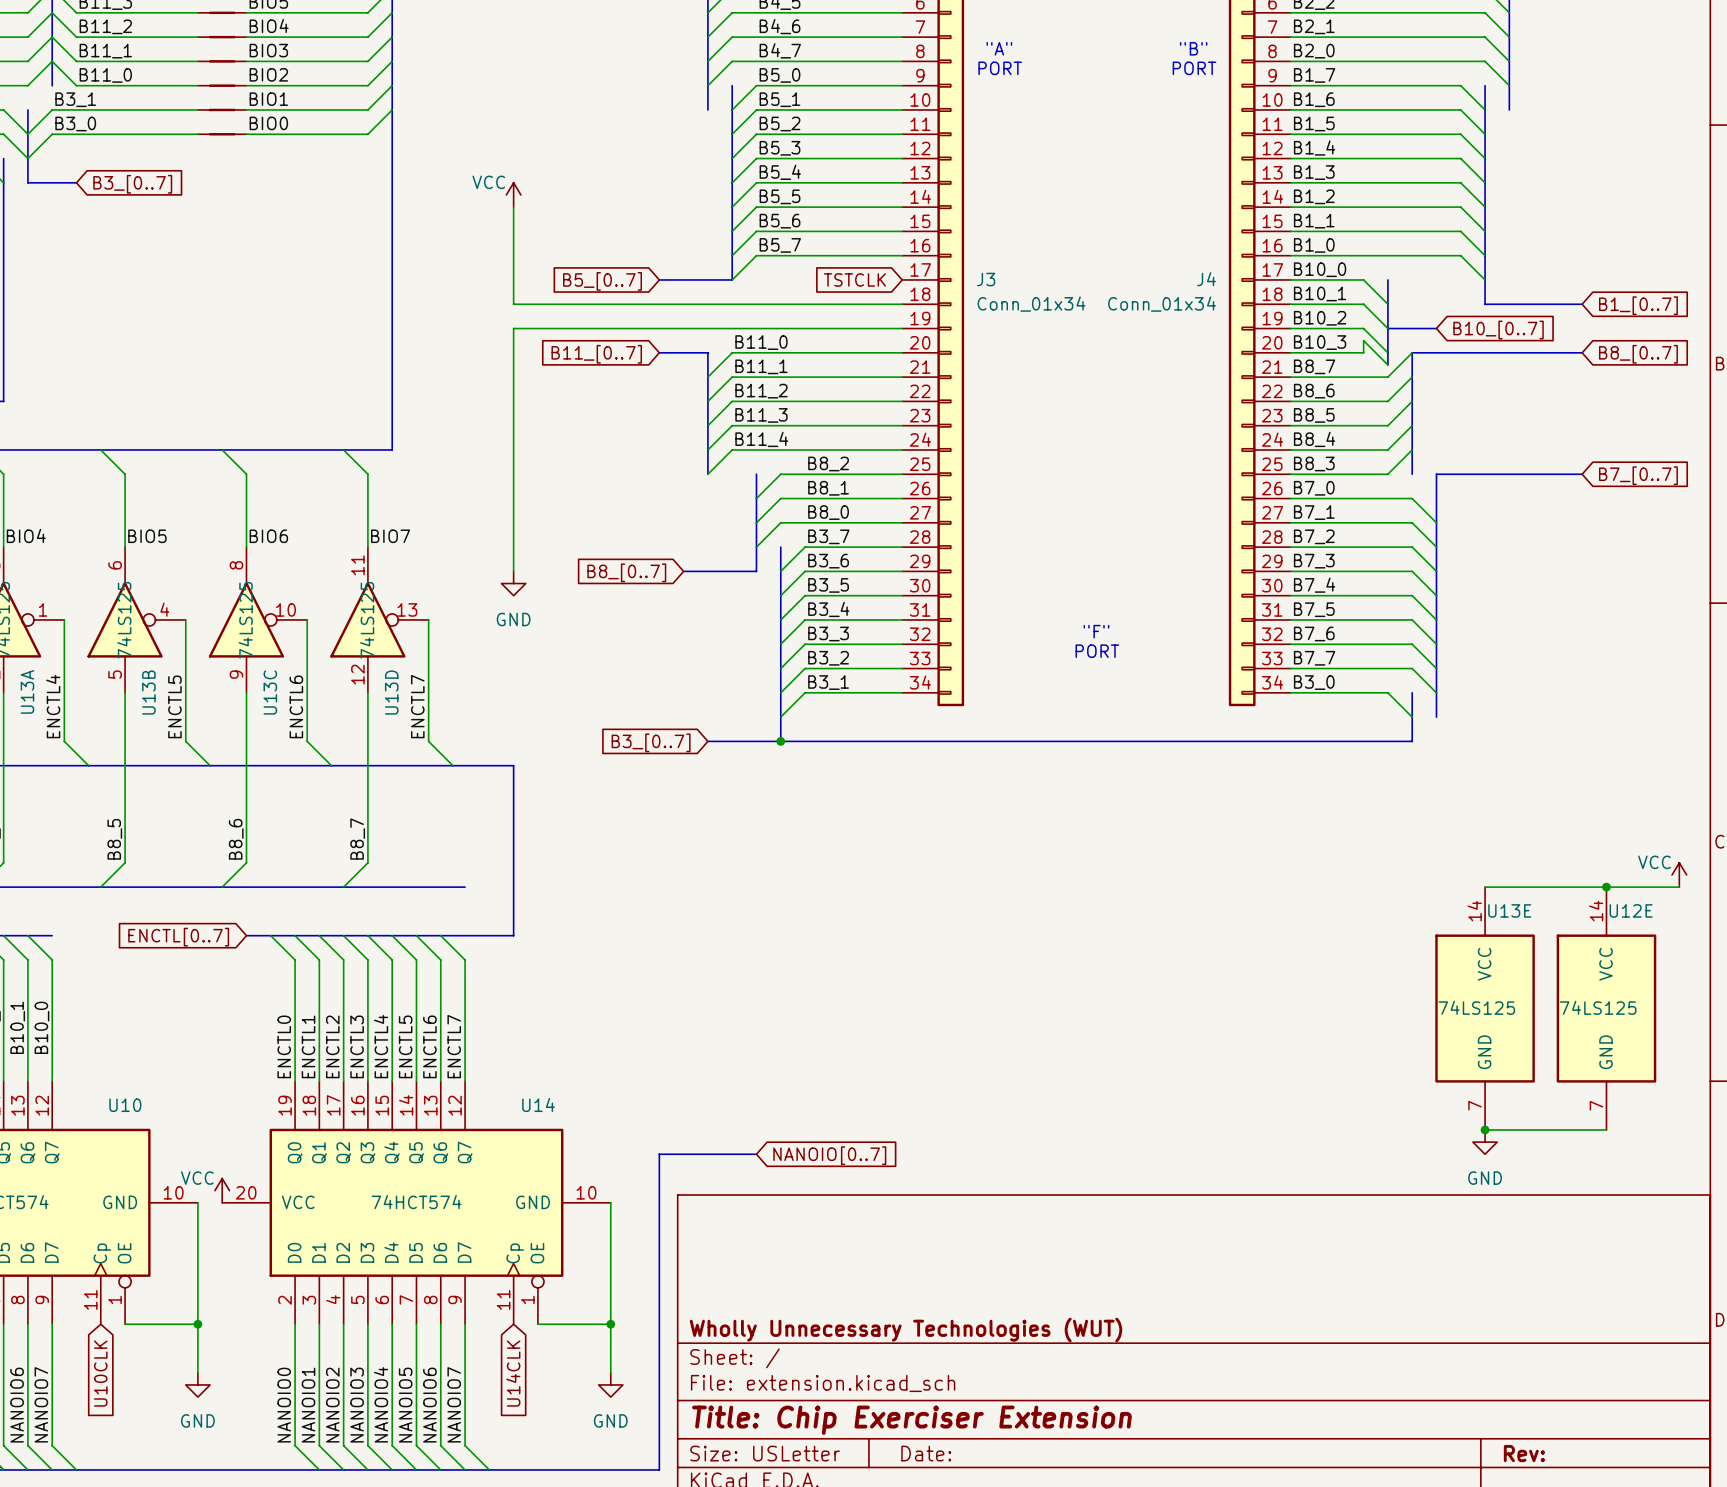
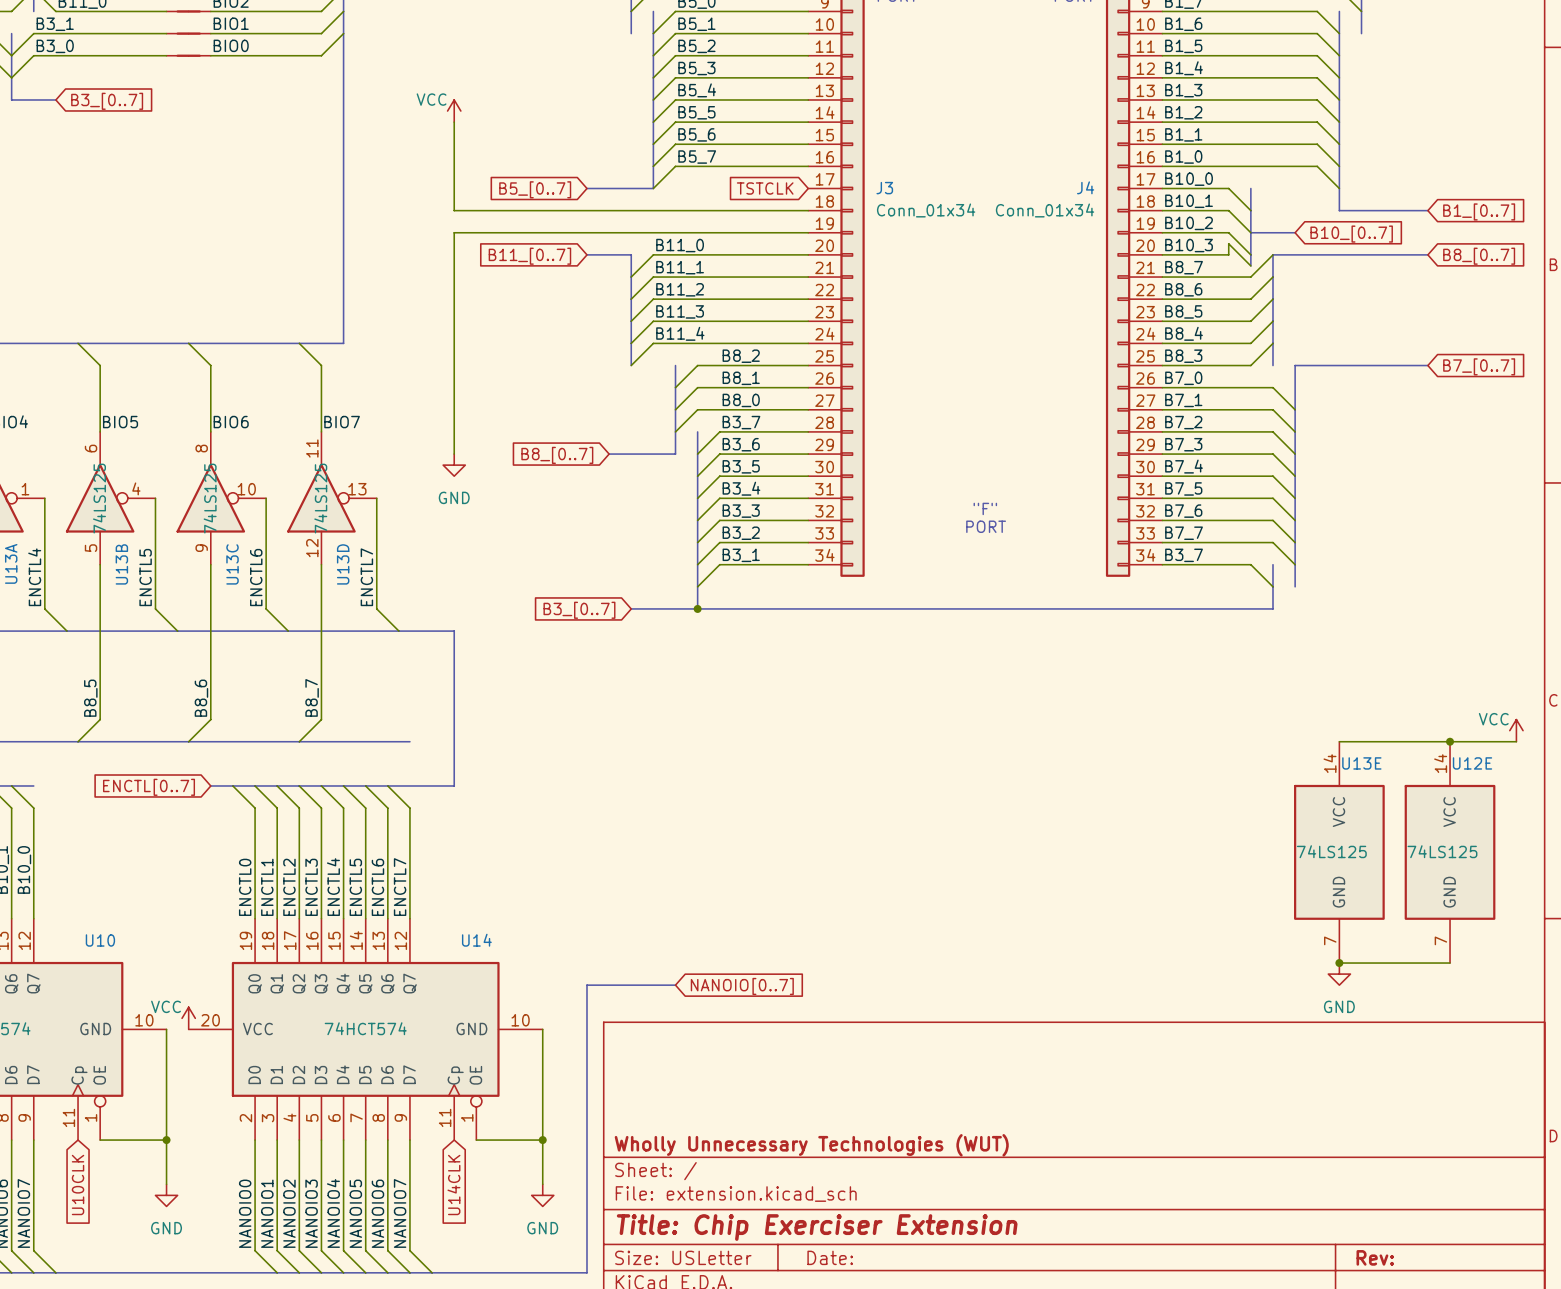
label: B3_0 (1314, 682) -> B3_7 (1184, 555)

